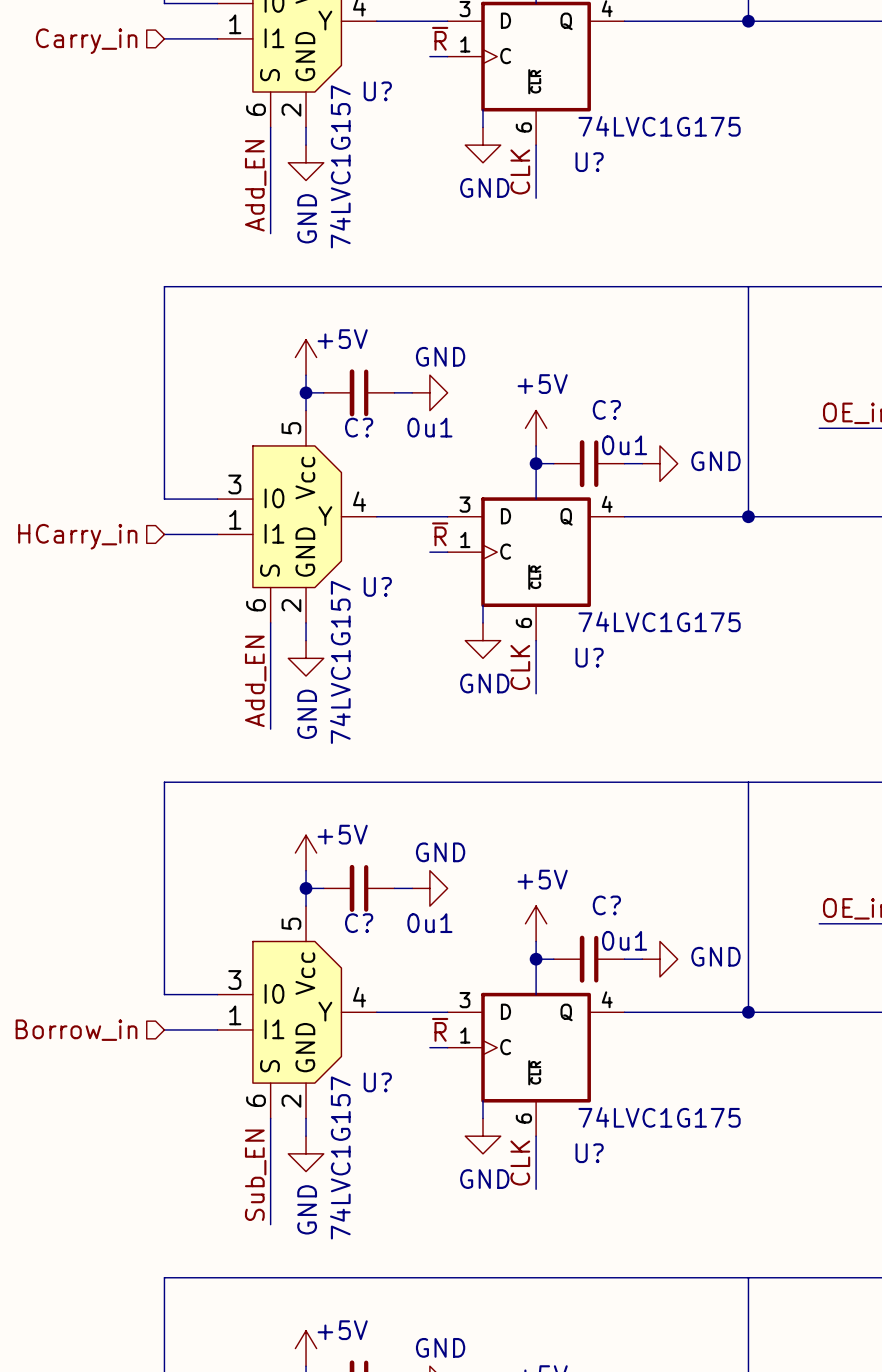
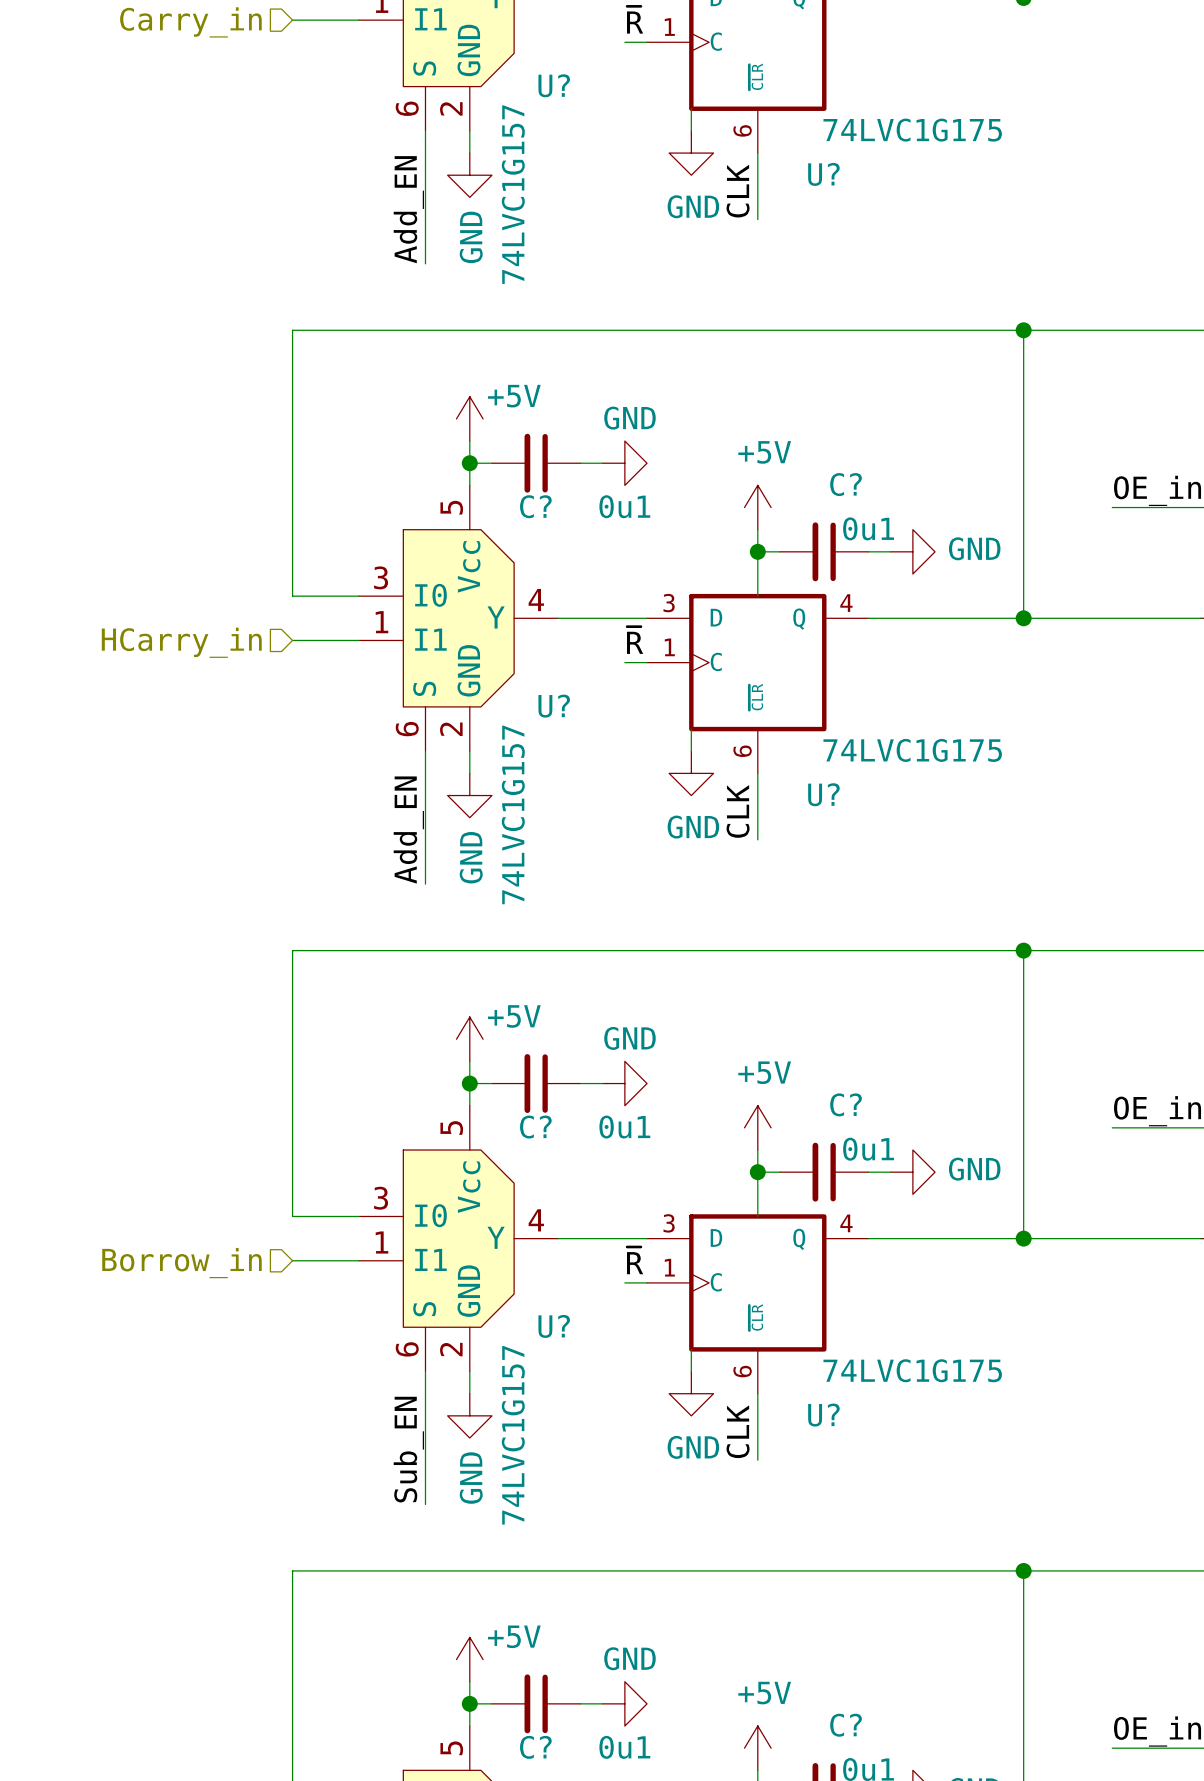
junction: none -> (1023, 330)
junction: none -> (1023, 950)
junction: none -> (1023, 1570)

